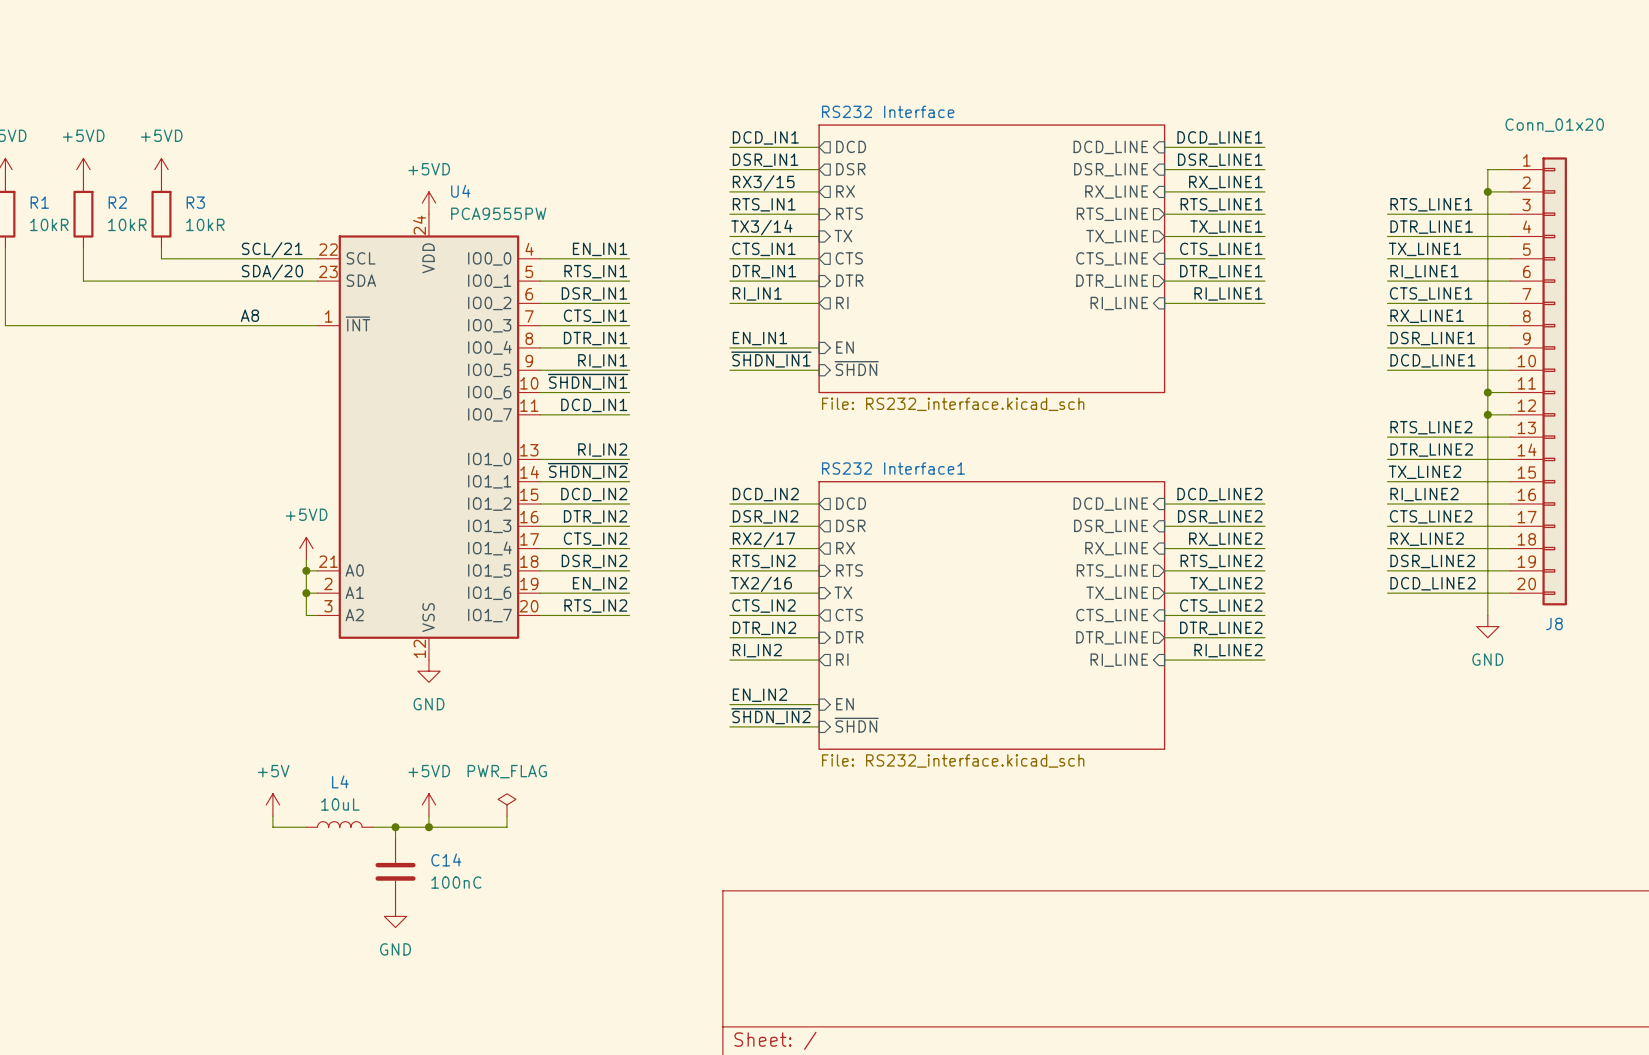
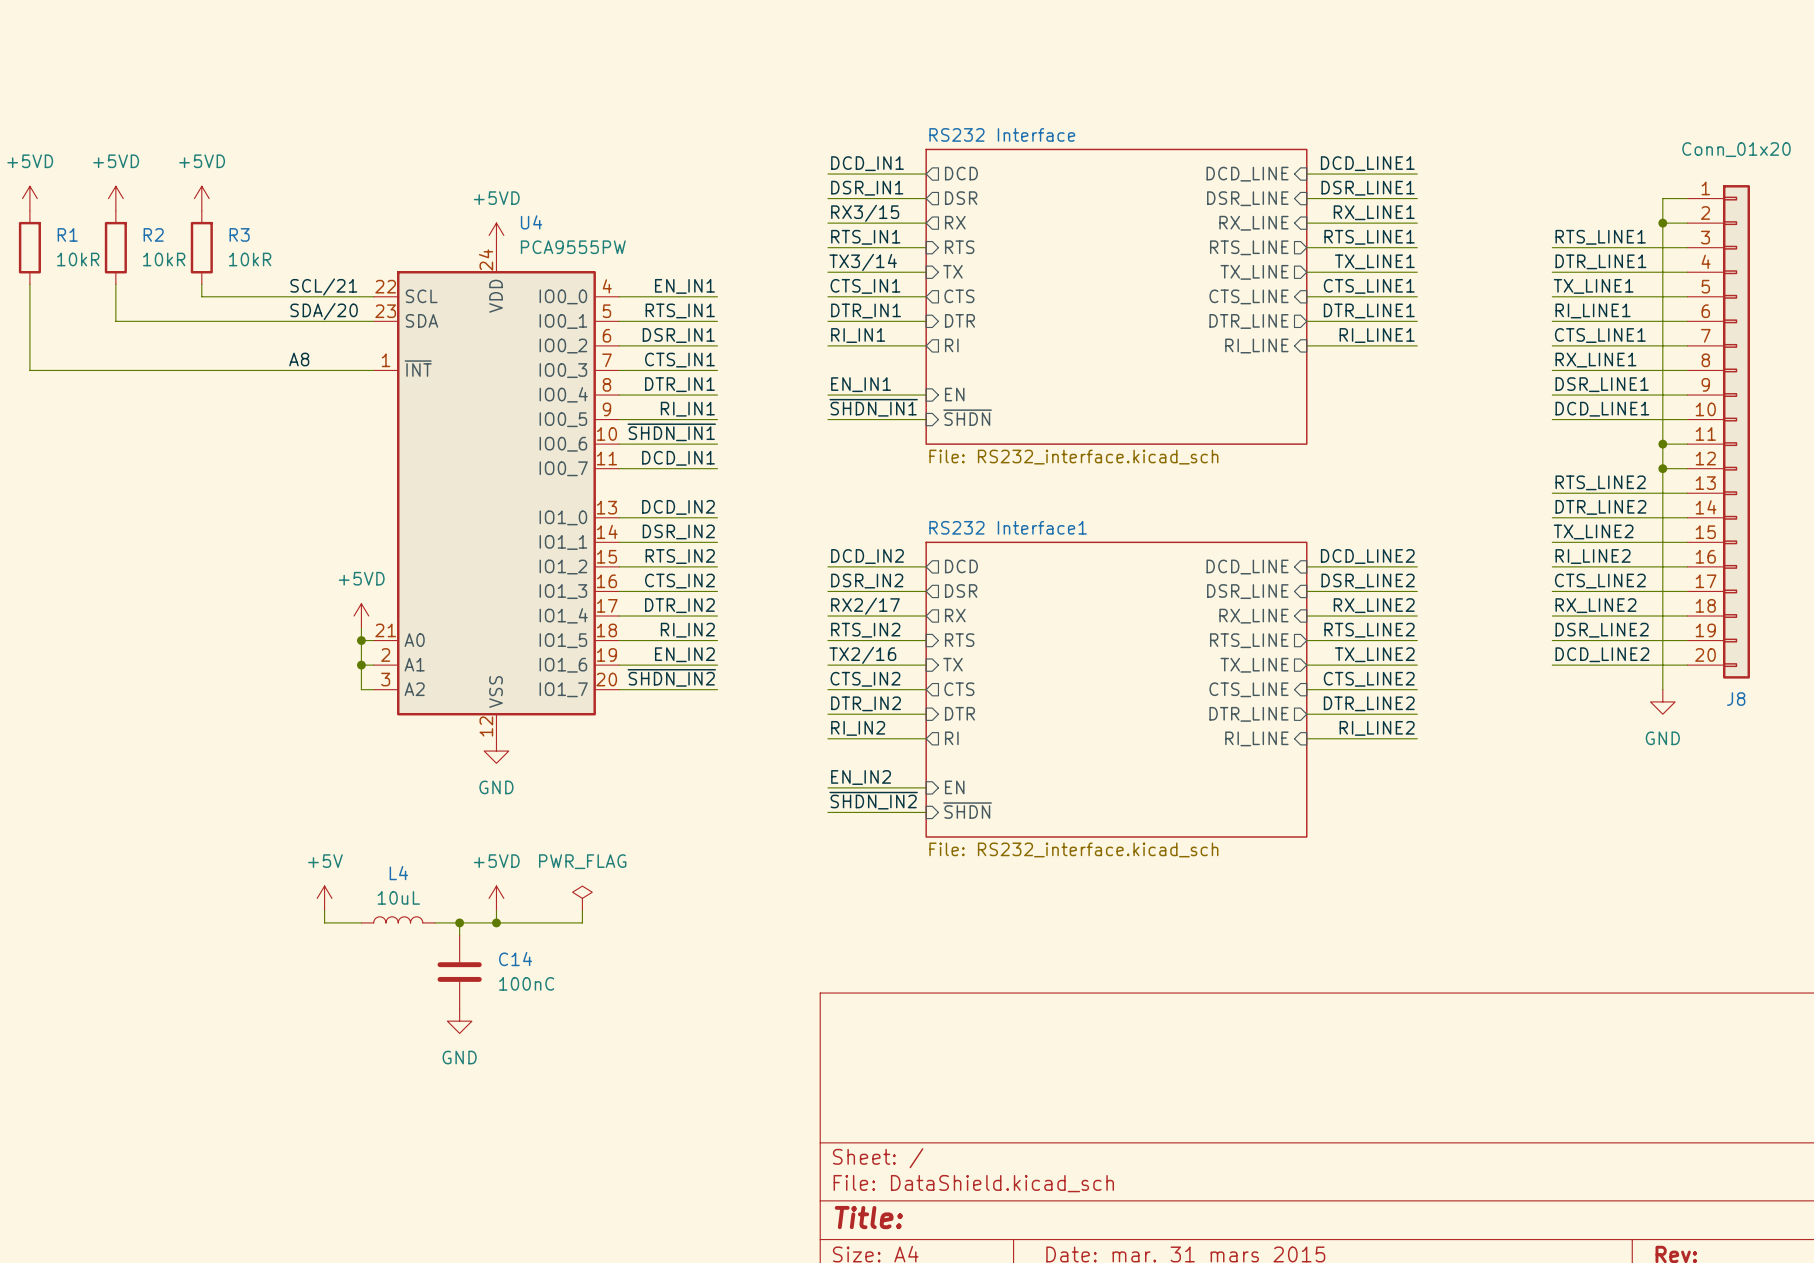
label: RI_IN2 (602, 450) -> DCD_IN2 (678, 507)
label: ~{SHDN_IN2} (588, 471) -> DSR_IN2 (678, 531)
label: DCD_IN2 (594, 494) -> RTS_IN2 (680, 556)
label: DTR_IN2 (595, 516) -> CTS_IN2 (679, 581)
label: CTS_IN2 (595, 539) -> DTR_IN2 (679, 605)
label: DSR_IN2 (594, 561) -> RI_IN2 (687, 630)
label: RTS_IN2 (595, 606) -> ~{SHDN_IN2} (671, 677)

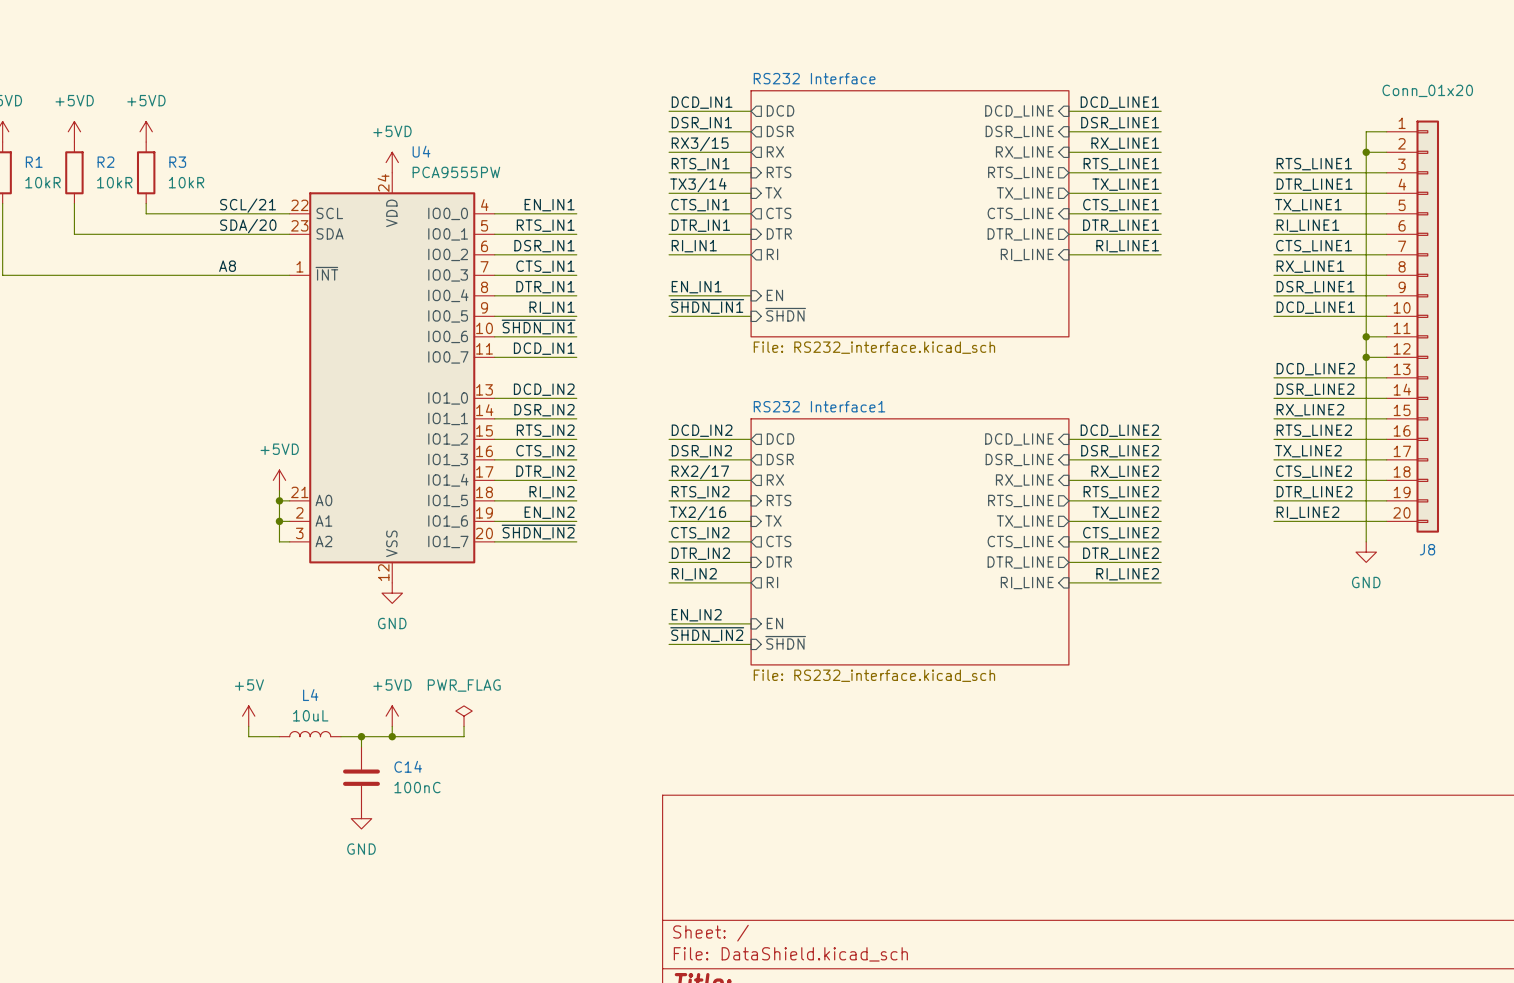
label: RTS_LINE2 (1600, 482) -> DCD_LINE2 (1315, 369)
label: DTR_LINE2 (1600, 507) -> DSR_LINE2 (1315, 389)
label: TX_LINE2 (1593, 531) -> RX_LINE2 (1310, 410)
label: RI_LINE2 (1593, 556) -> RTS_LINE2 (1314, 430)
label: CTS_LINE2 (1600, 581) -> TX_LINE2 (1308, 451)
label: RX_LINE2 (1595, 605) -> CTS_LINE2 (1314, 471)
label: DSR_LINE2 (1602, 630) -> DTR_LINE2 (1314, 492)
label: DCD_LINE2 (1602, 654) -> RI_LINE2 (1307, 512)

